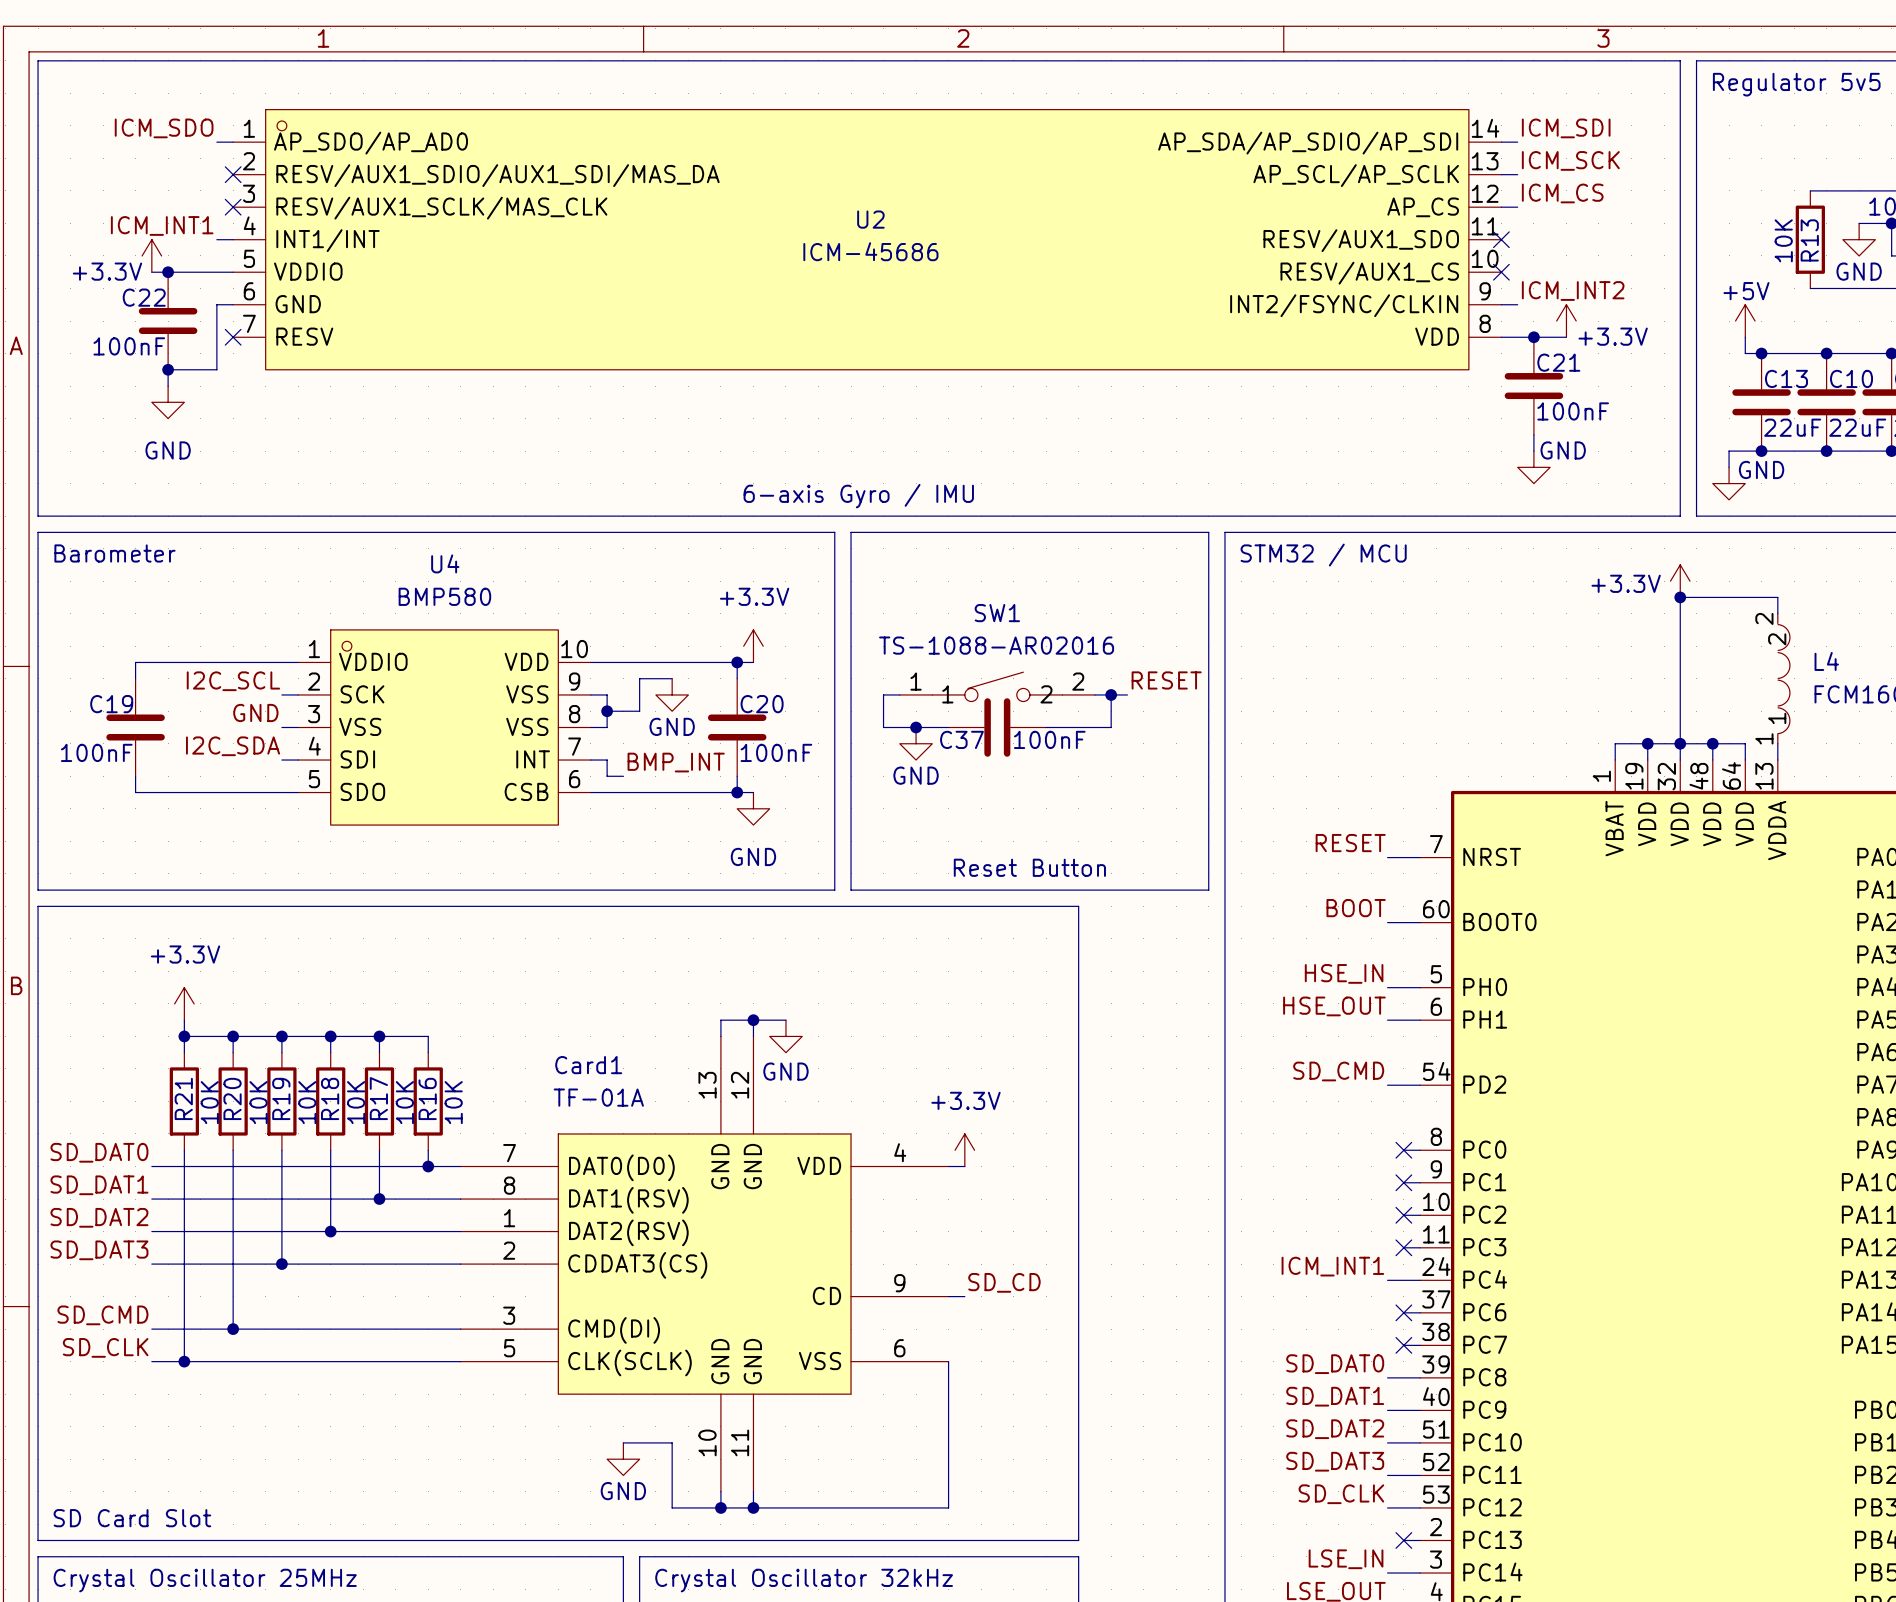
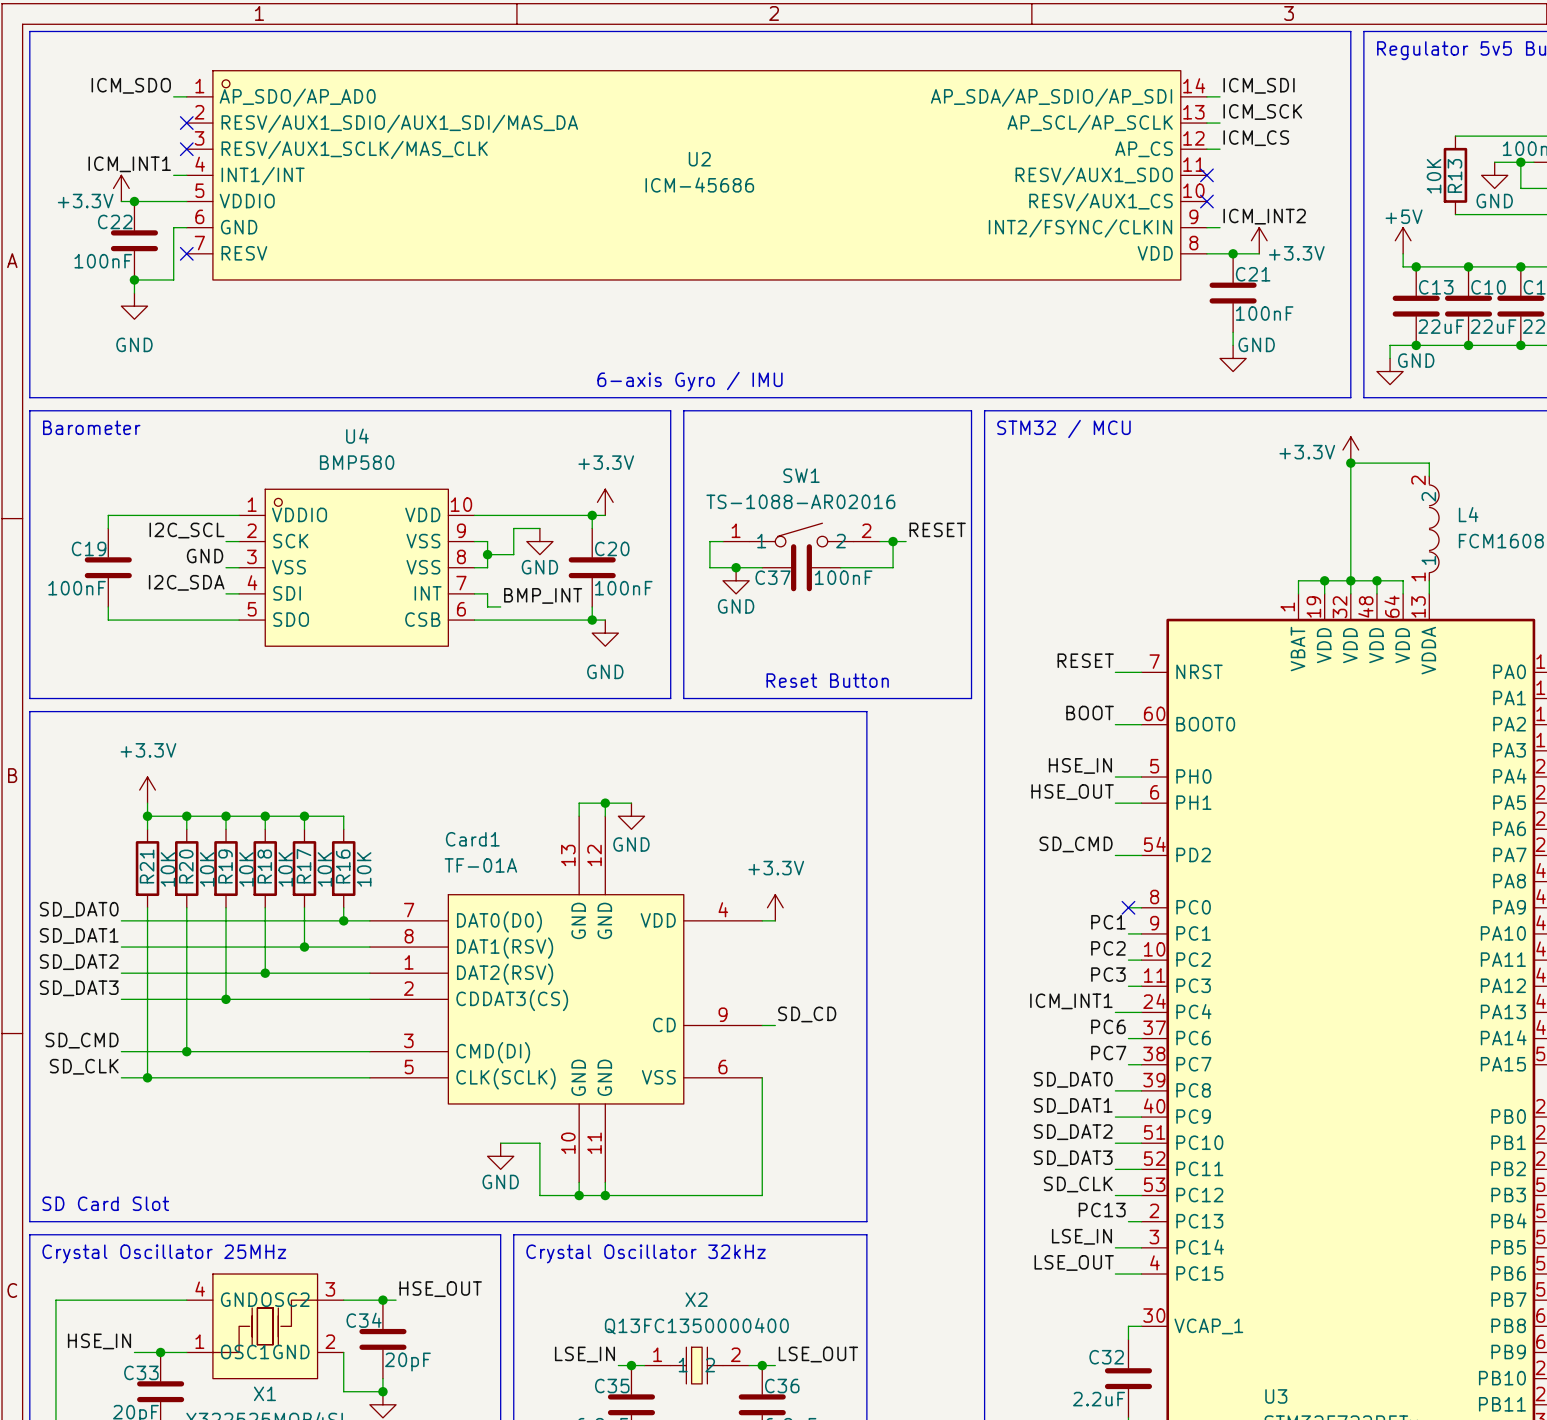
label: none -> PC1 (1108, 922)
no-connect mark: (1403, 1182) -> none
label: none -> PC2 (1108, 948)
no-connect mark: (1403, 1215) -> none
label: none -> PC3 (1108, 974)
no-connect mark: (1403, 1247) -> none
label: none -> PC6 (1108, 1026)
no-connect mark: (1403, 1312) -> none
label: none -> PC7 (1108, 1053)
no-connect mark: (1403, 1345) -> none
label: none -> PC13 (1102, 1210)
no-connect mark: (1403, 1540) -> none

